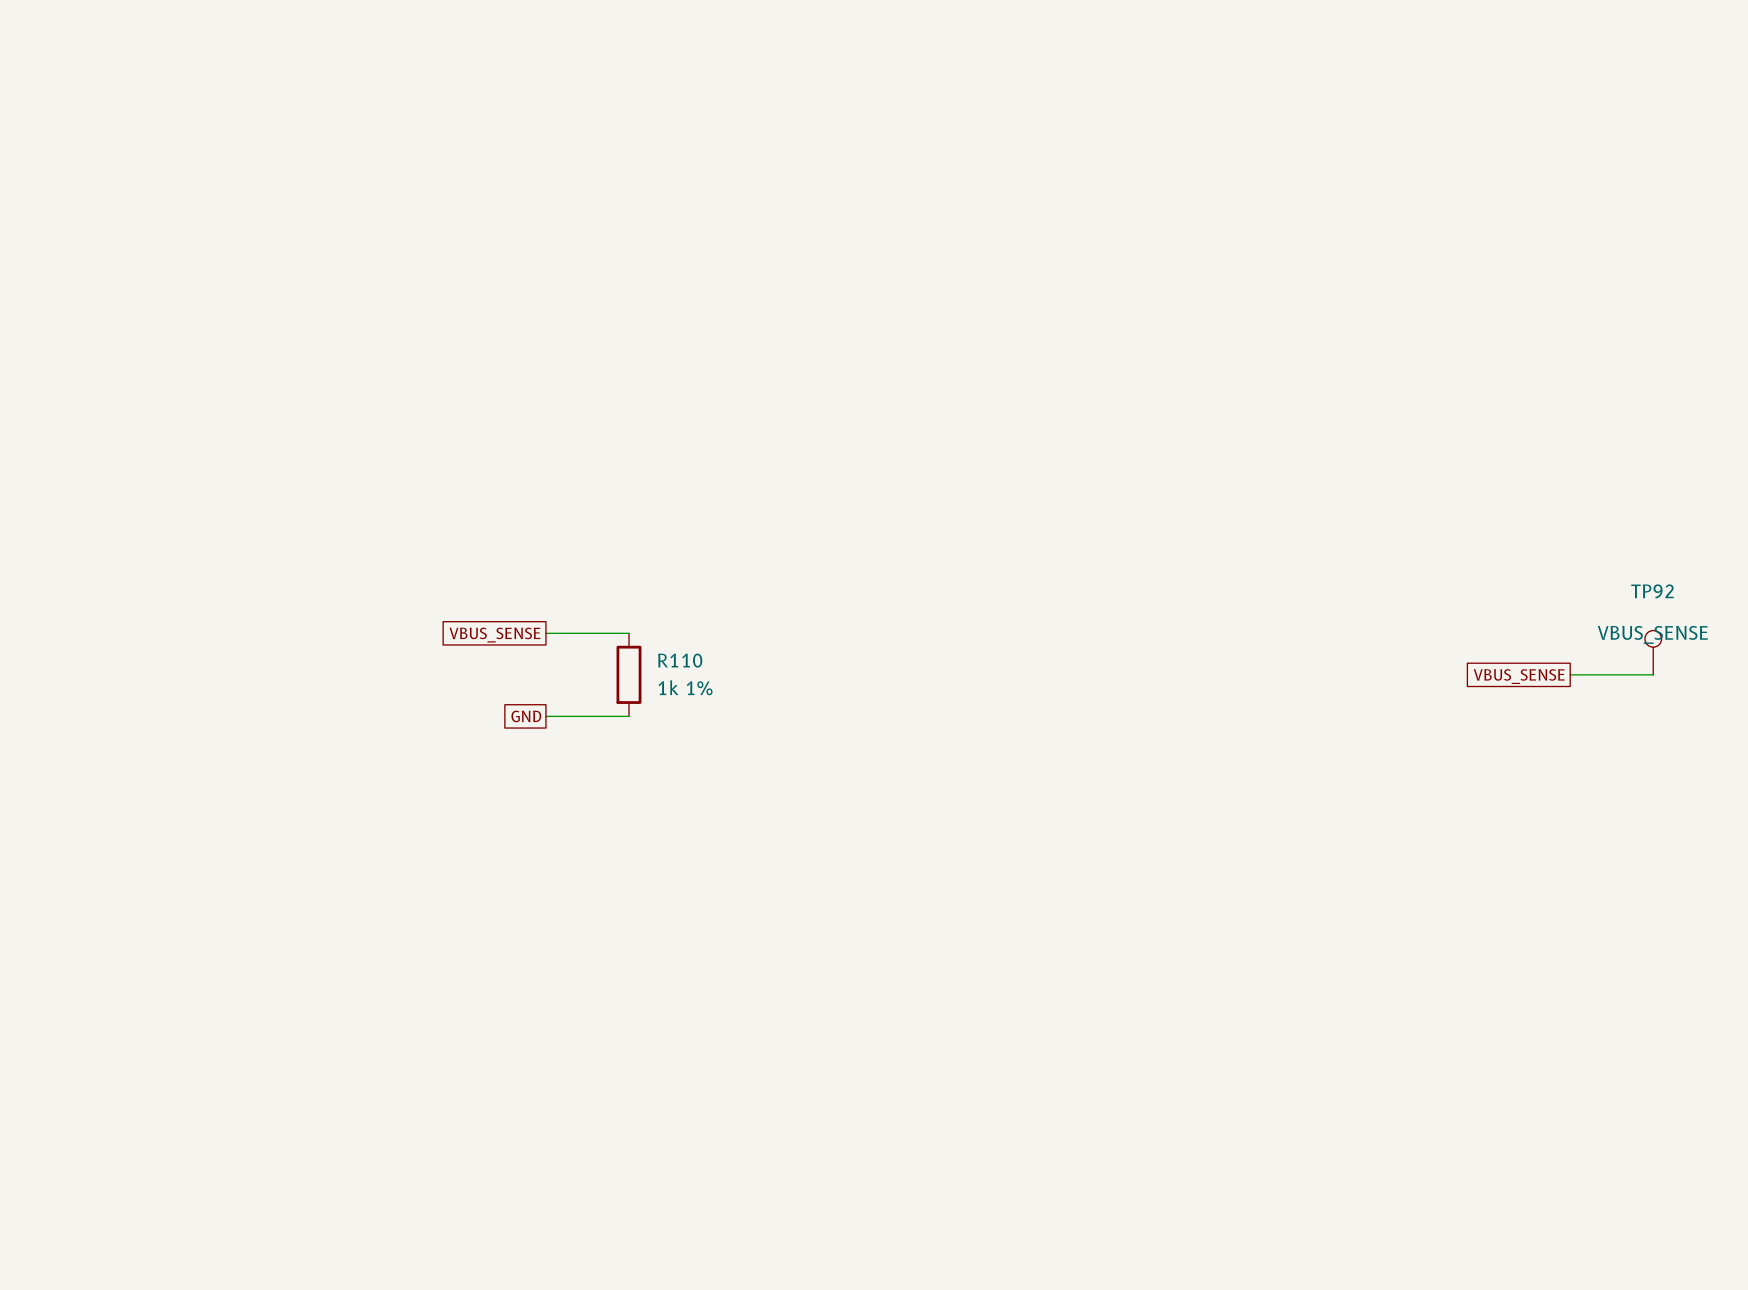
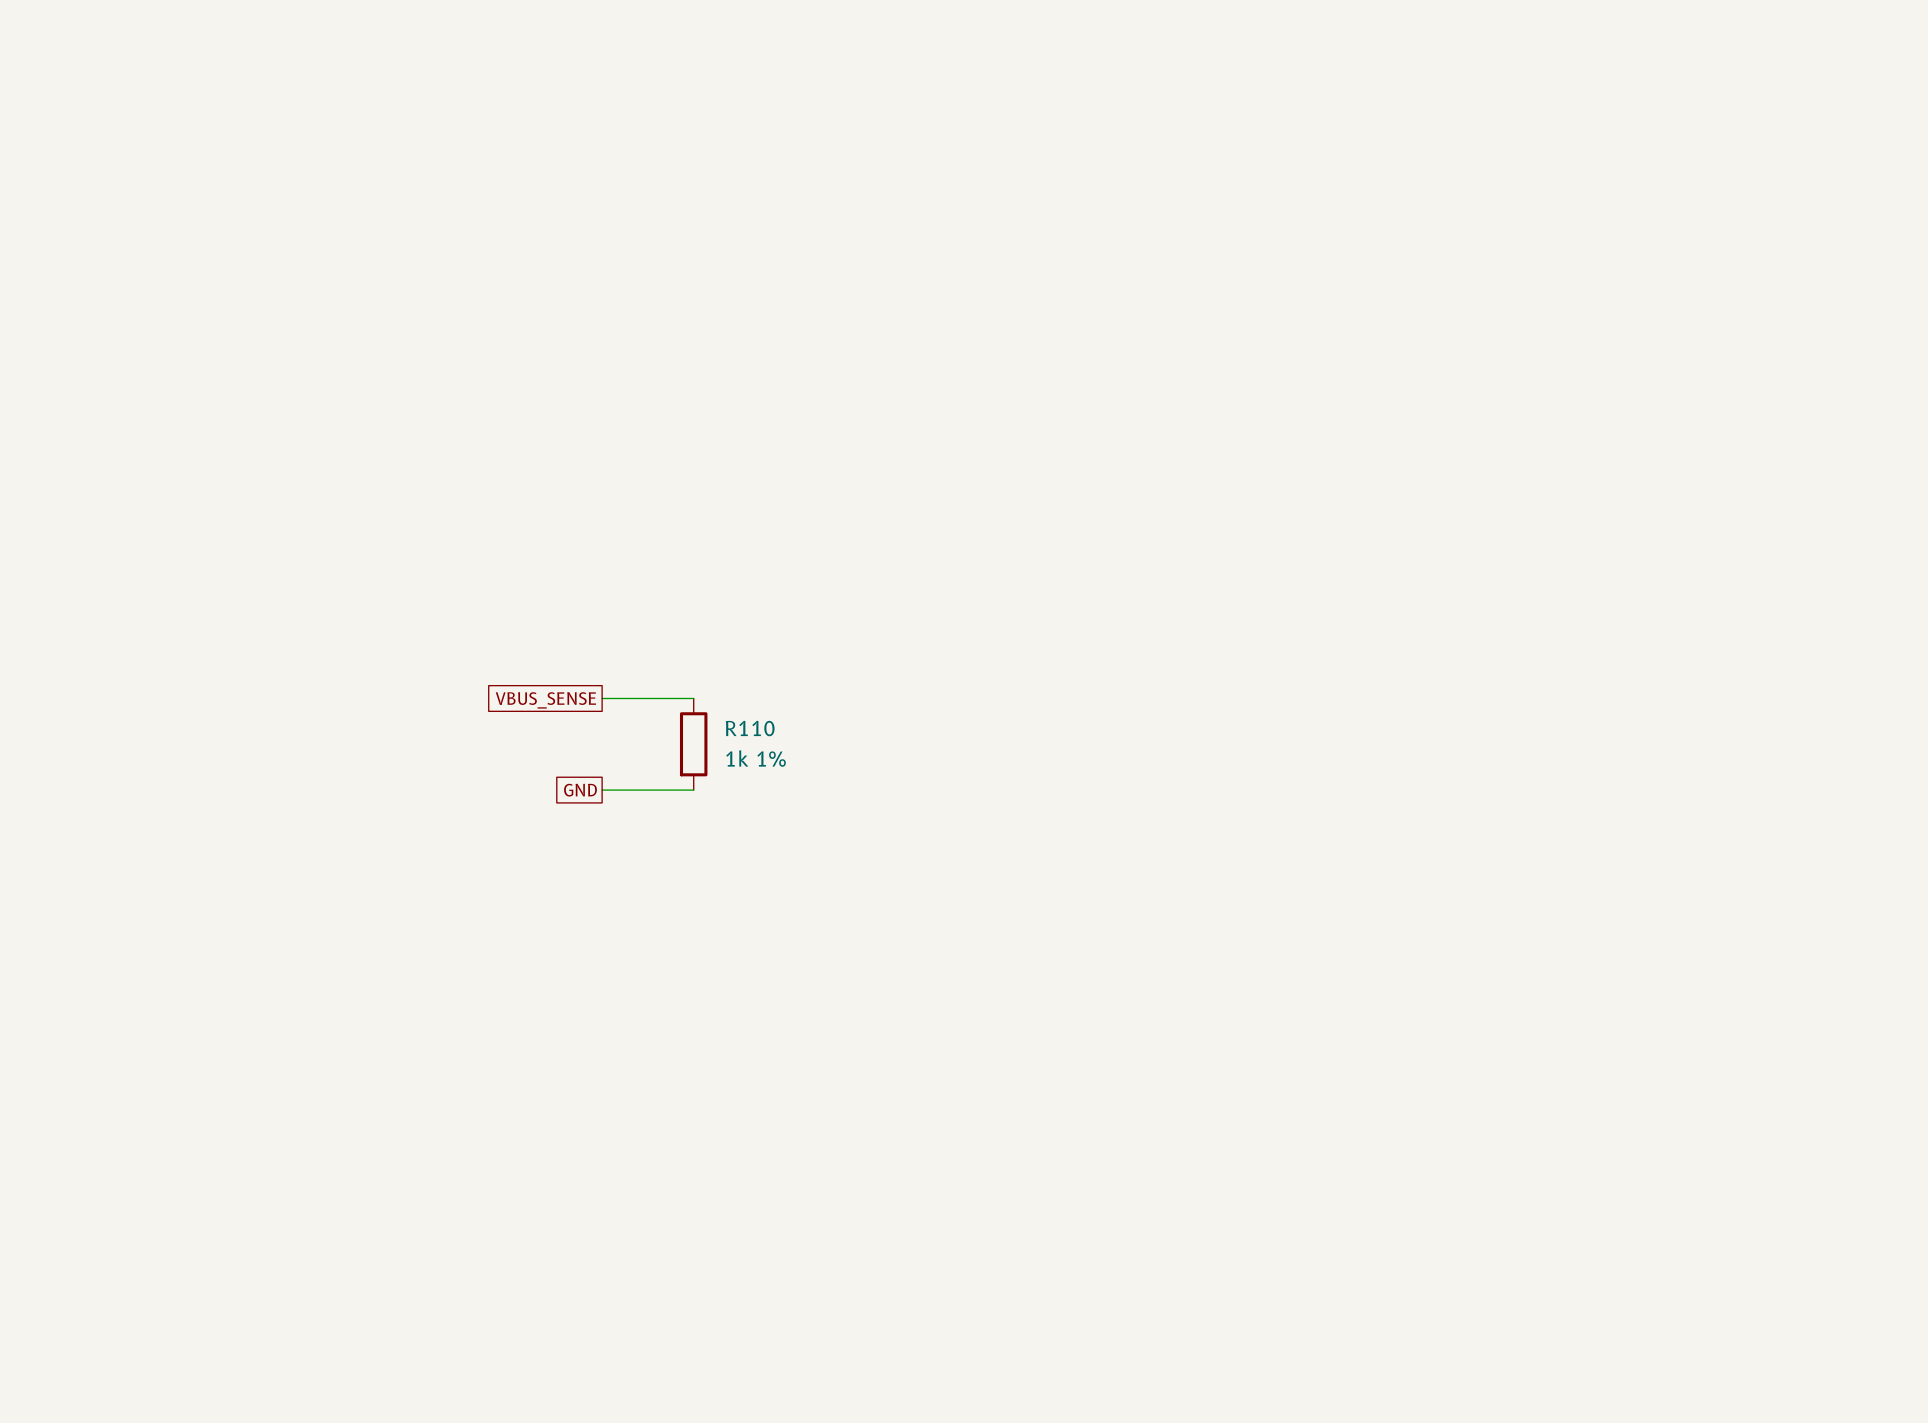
TP92: VBUS_SENSE (1653, 652) -> none
wire: (1570, 674) (1653, 674) -> none
global label: VBUS_SENSE (1519, 676) -> none

